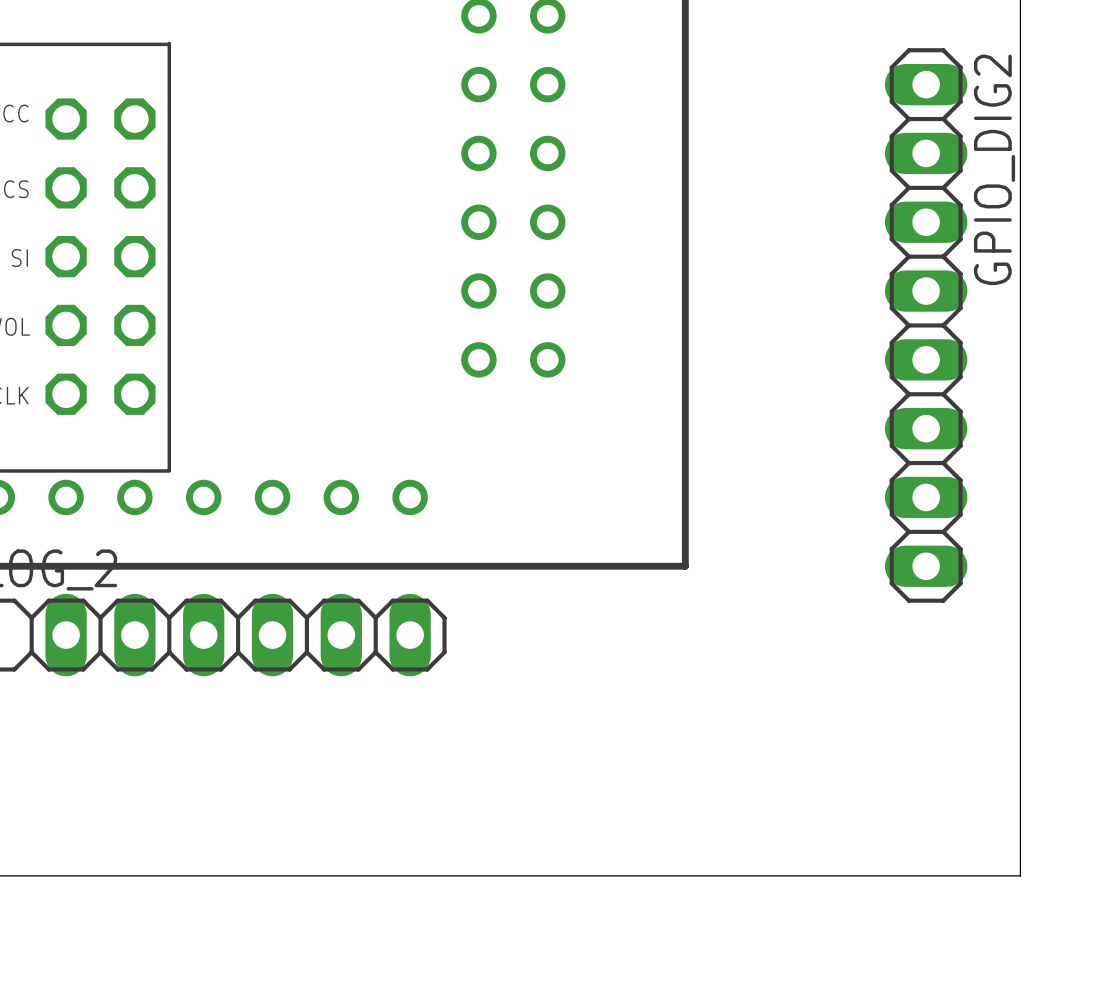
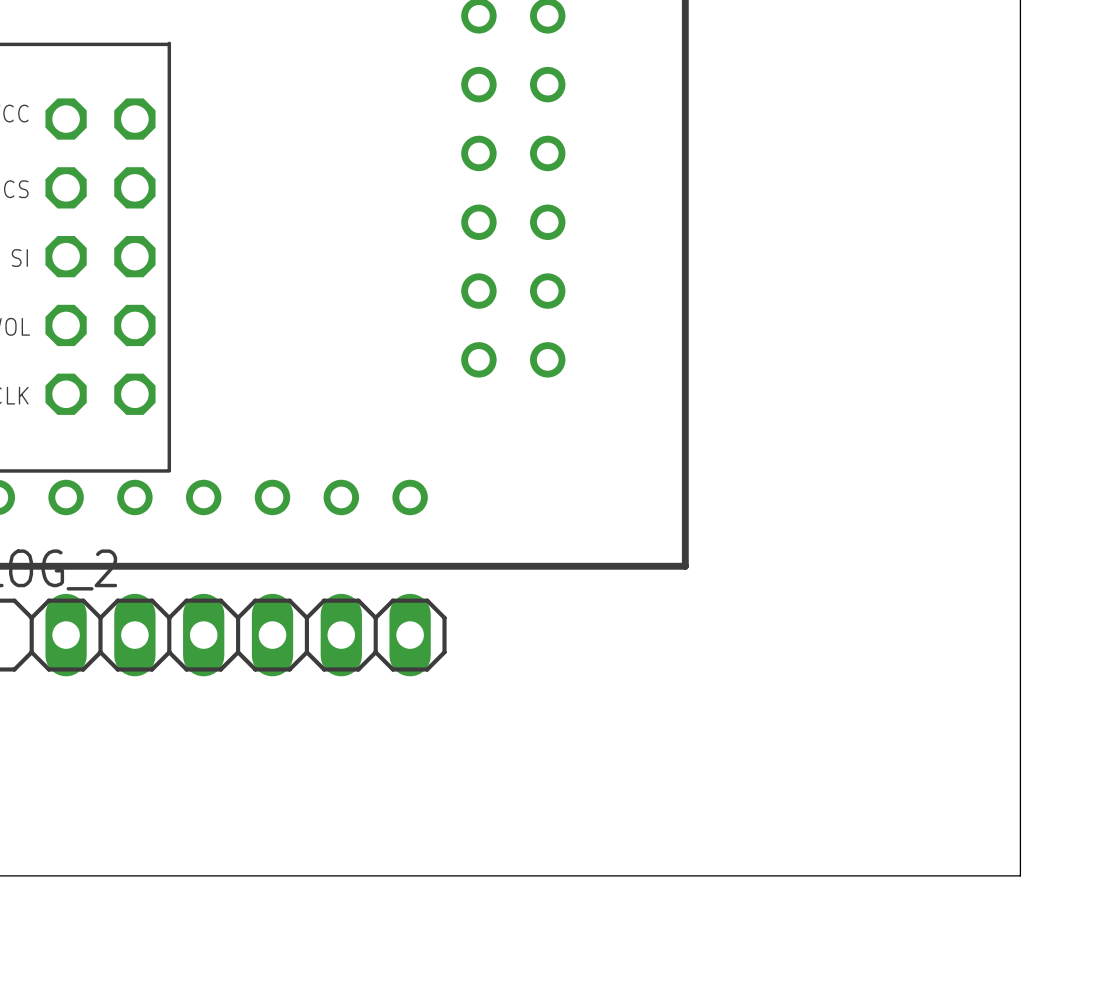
GPIO_DIG2: (926, 325) -> none

